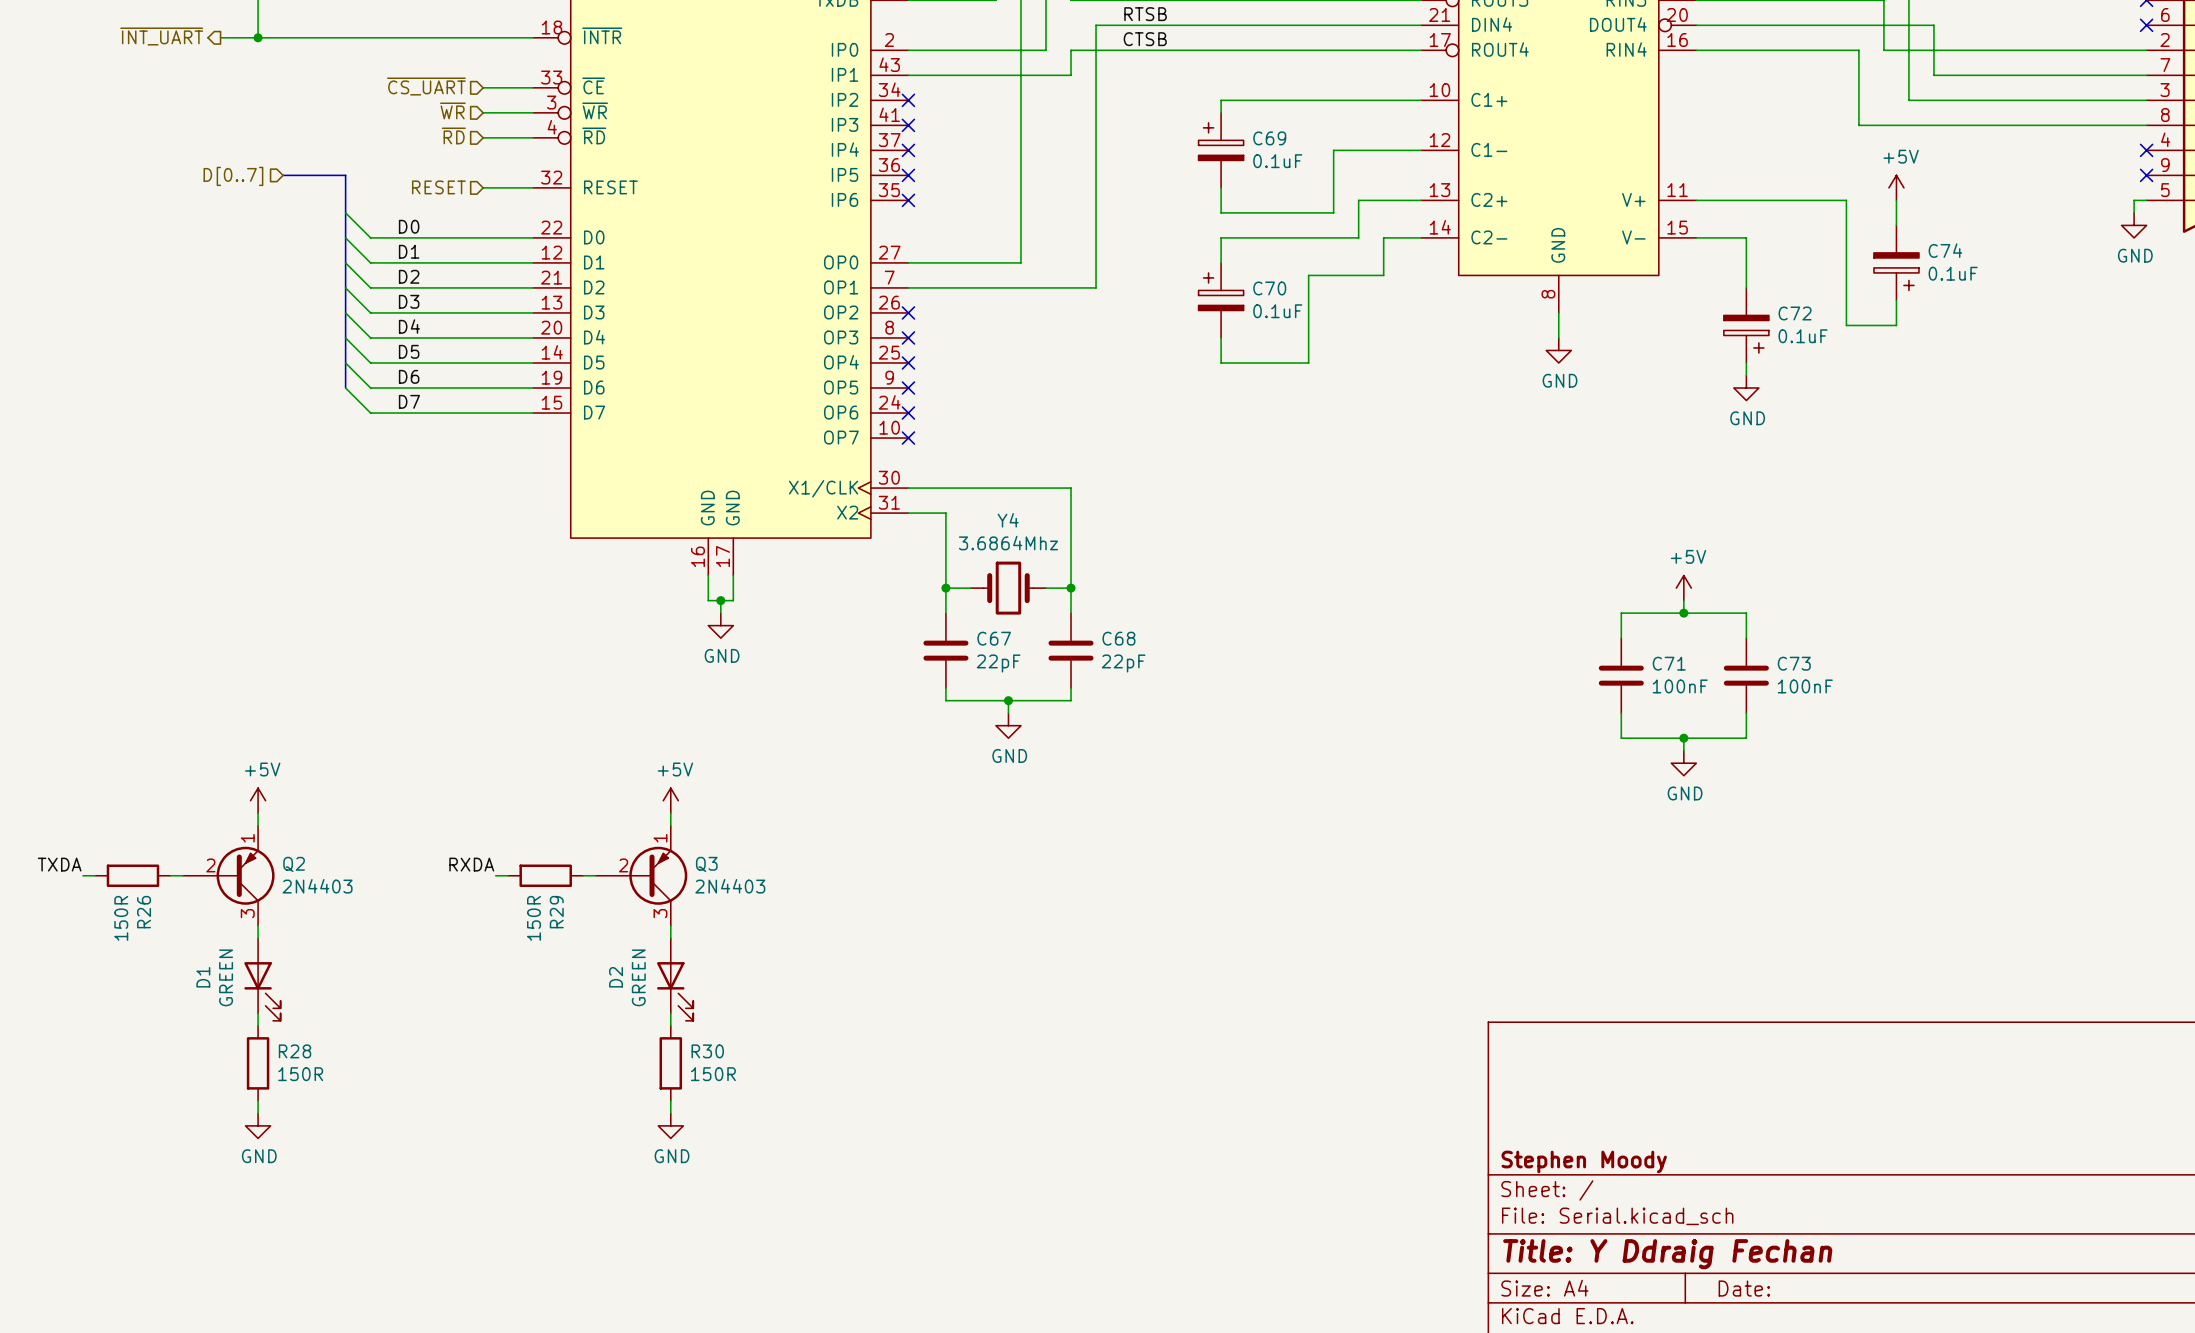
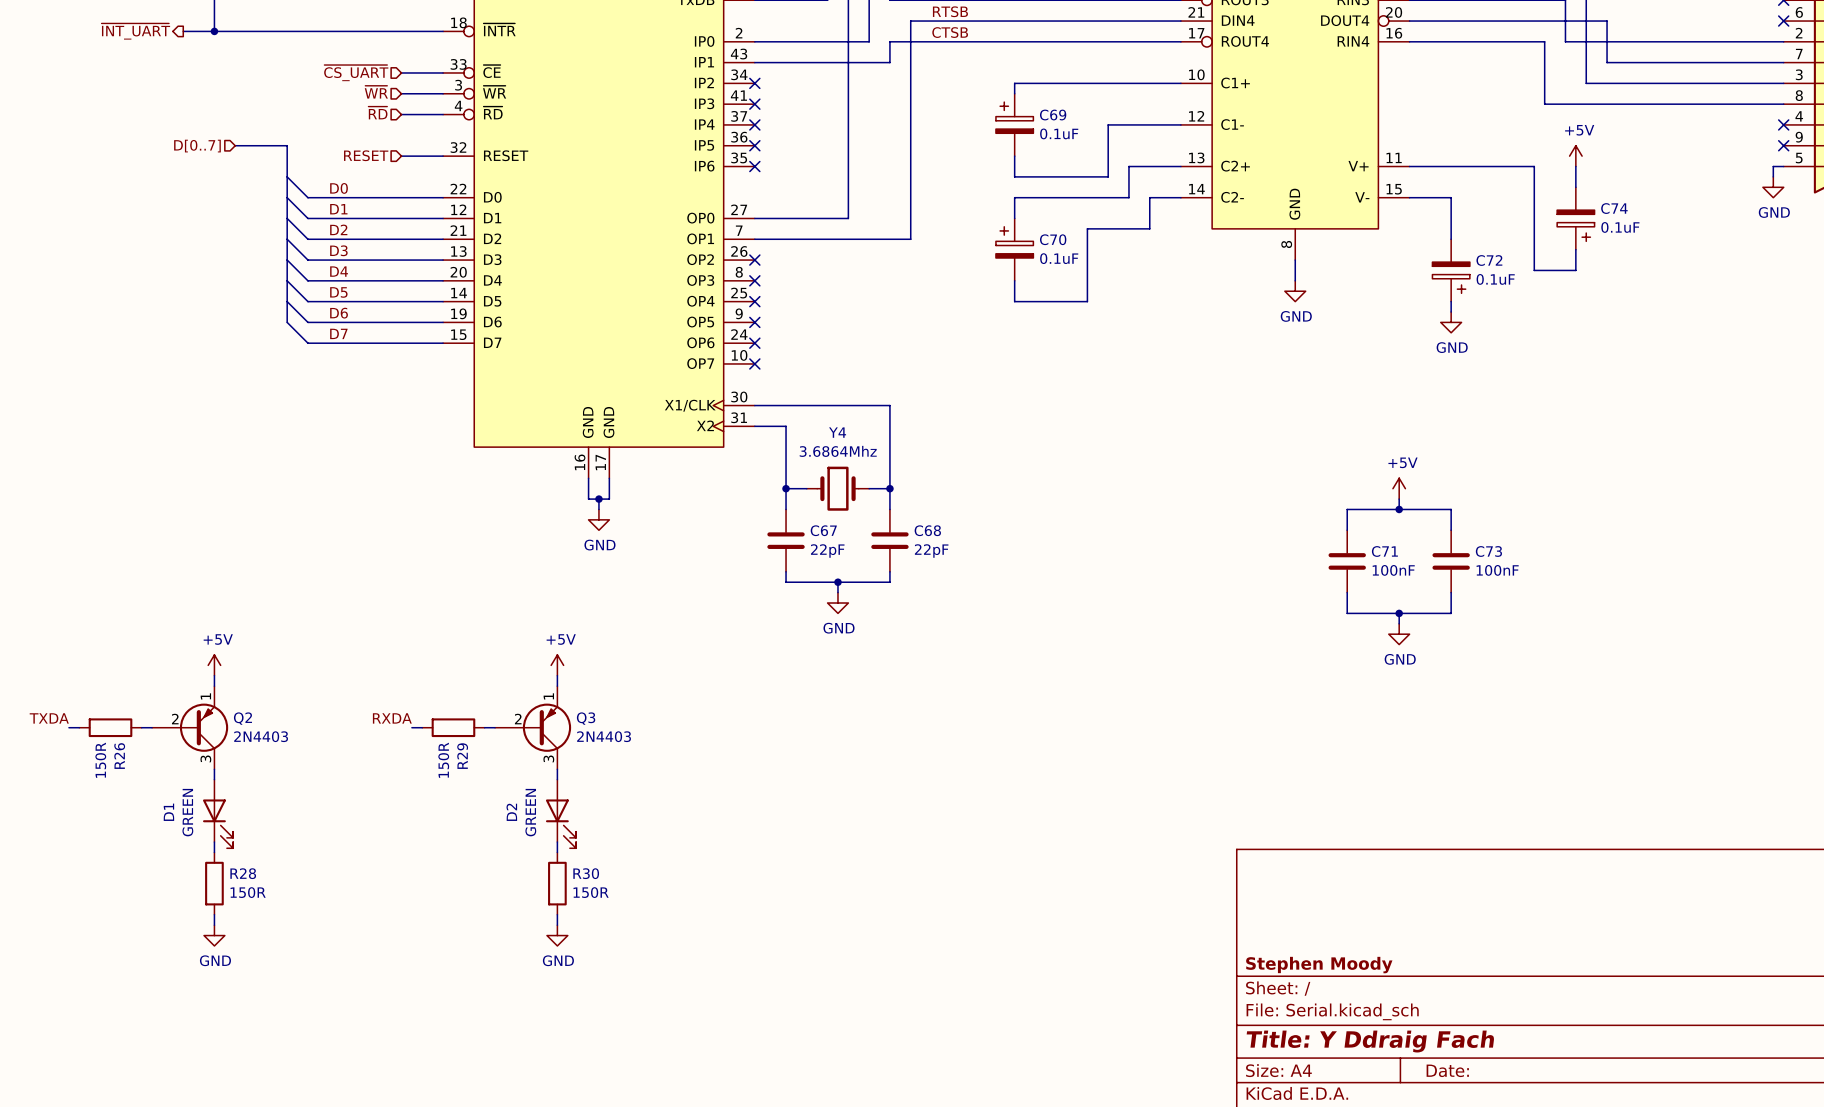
title block: Title: Y Ddraig Fechan (1667, 1254) -> Title: Y Ddraig Fach (1370, 1041)

